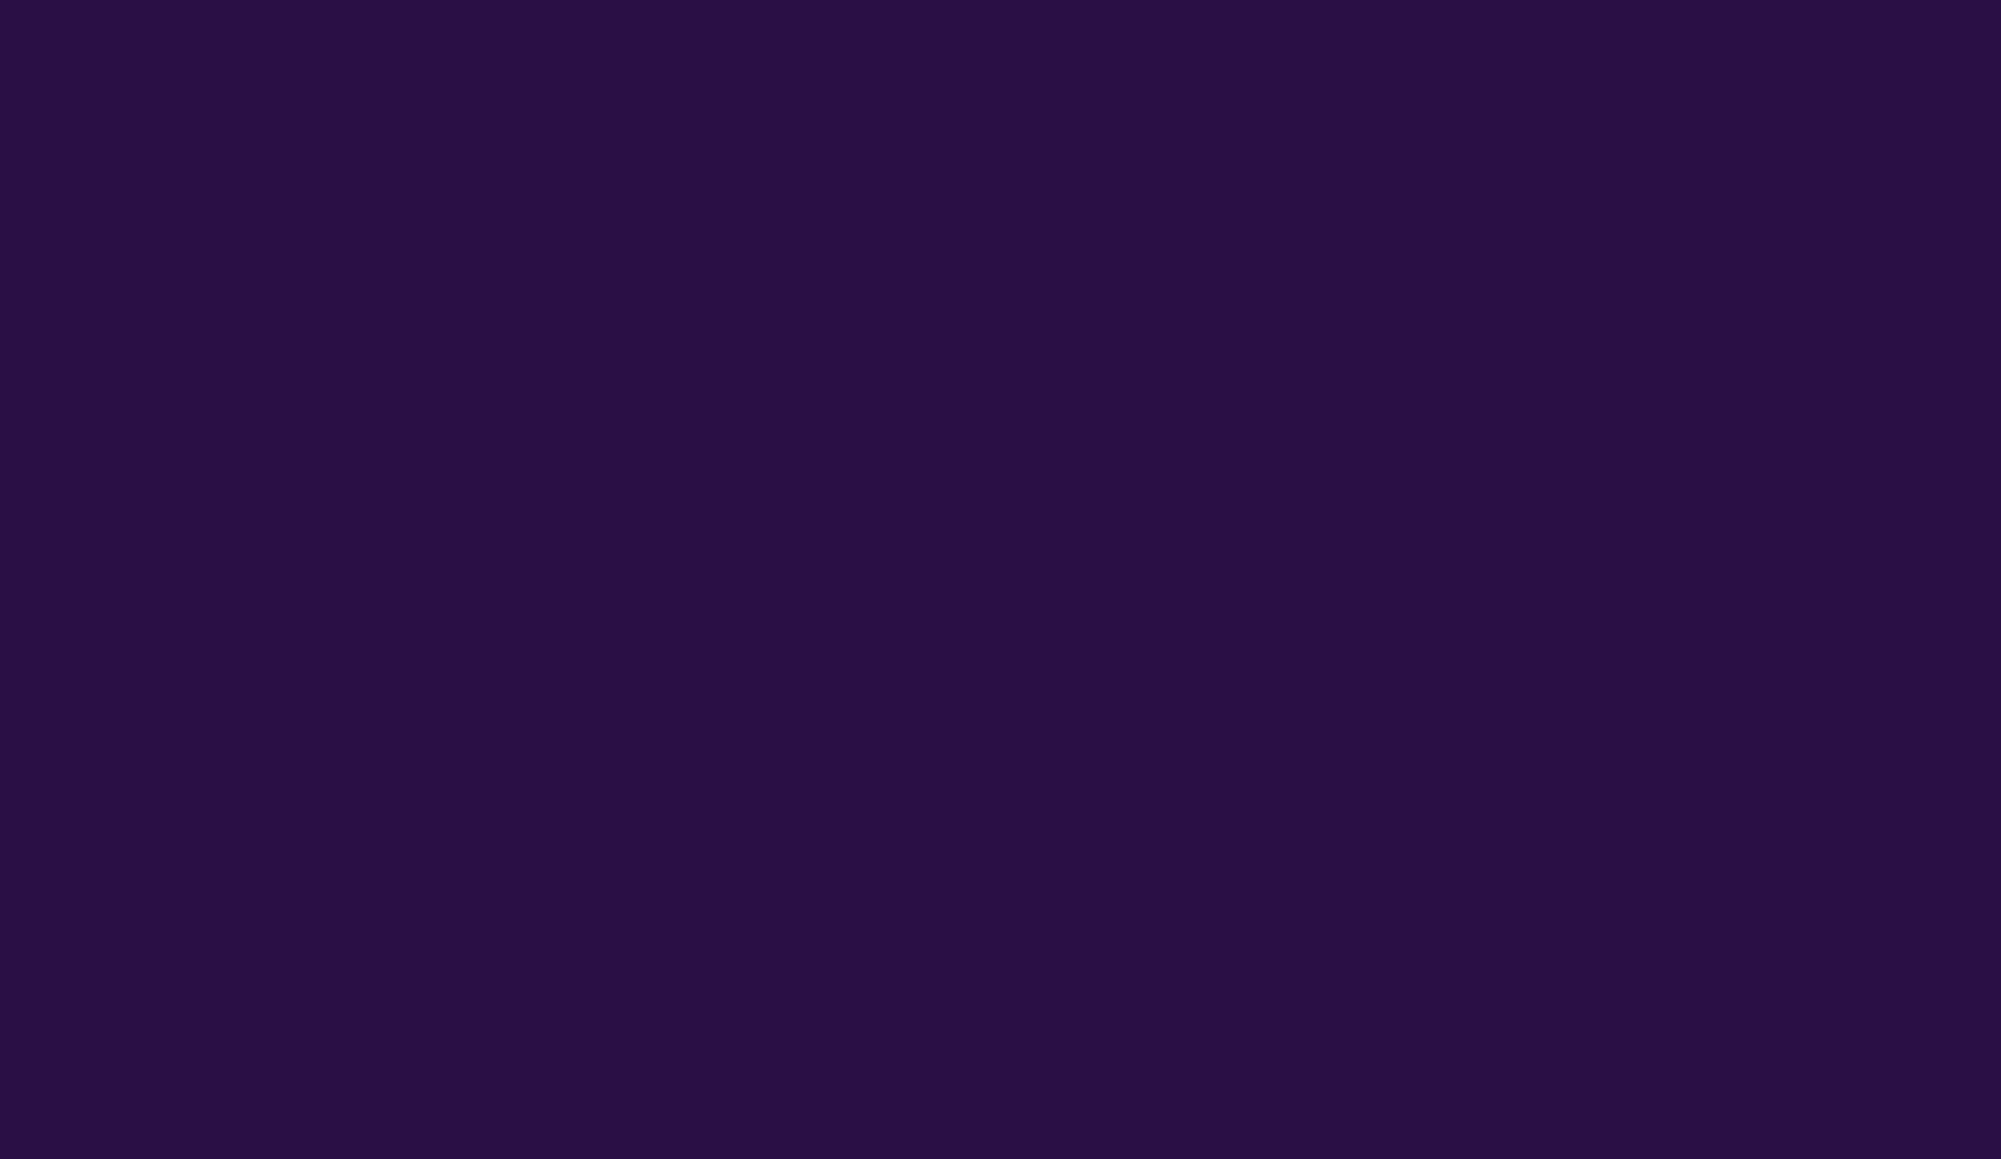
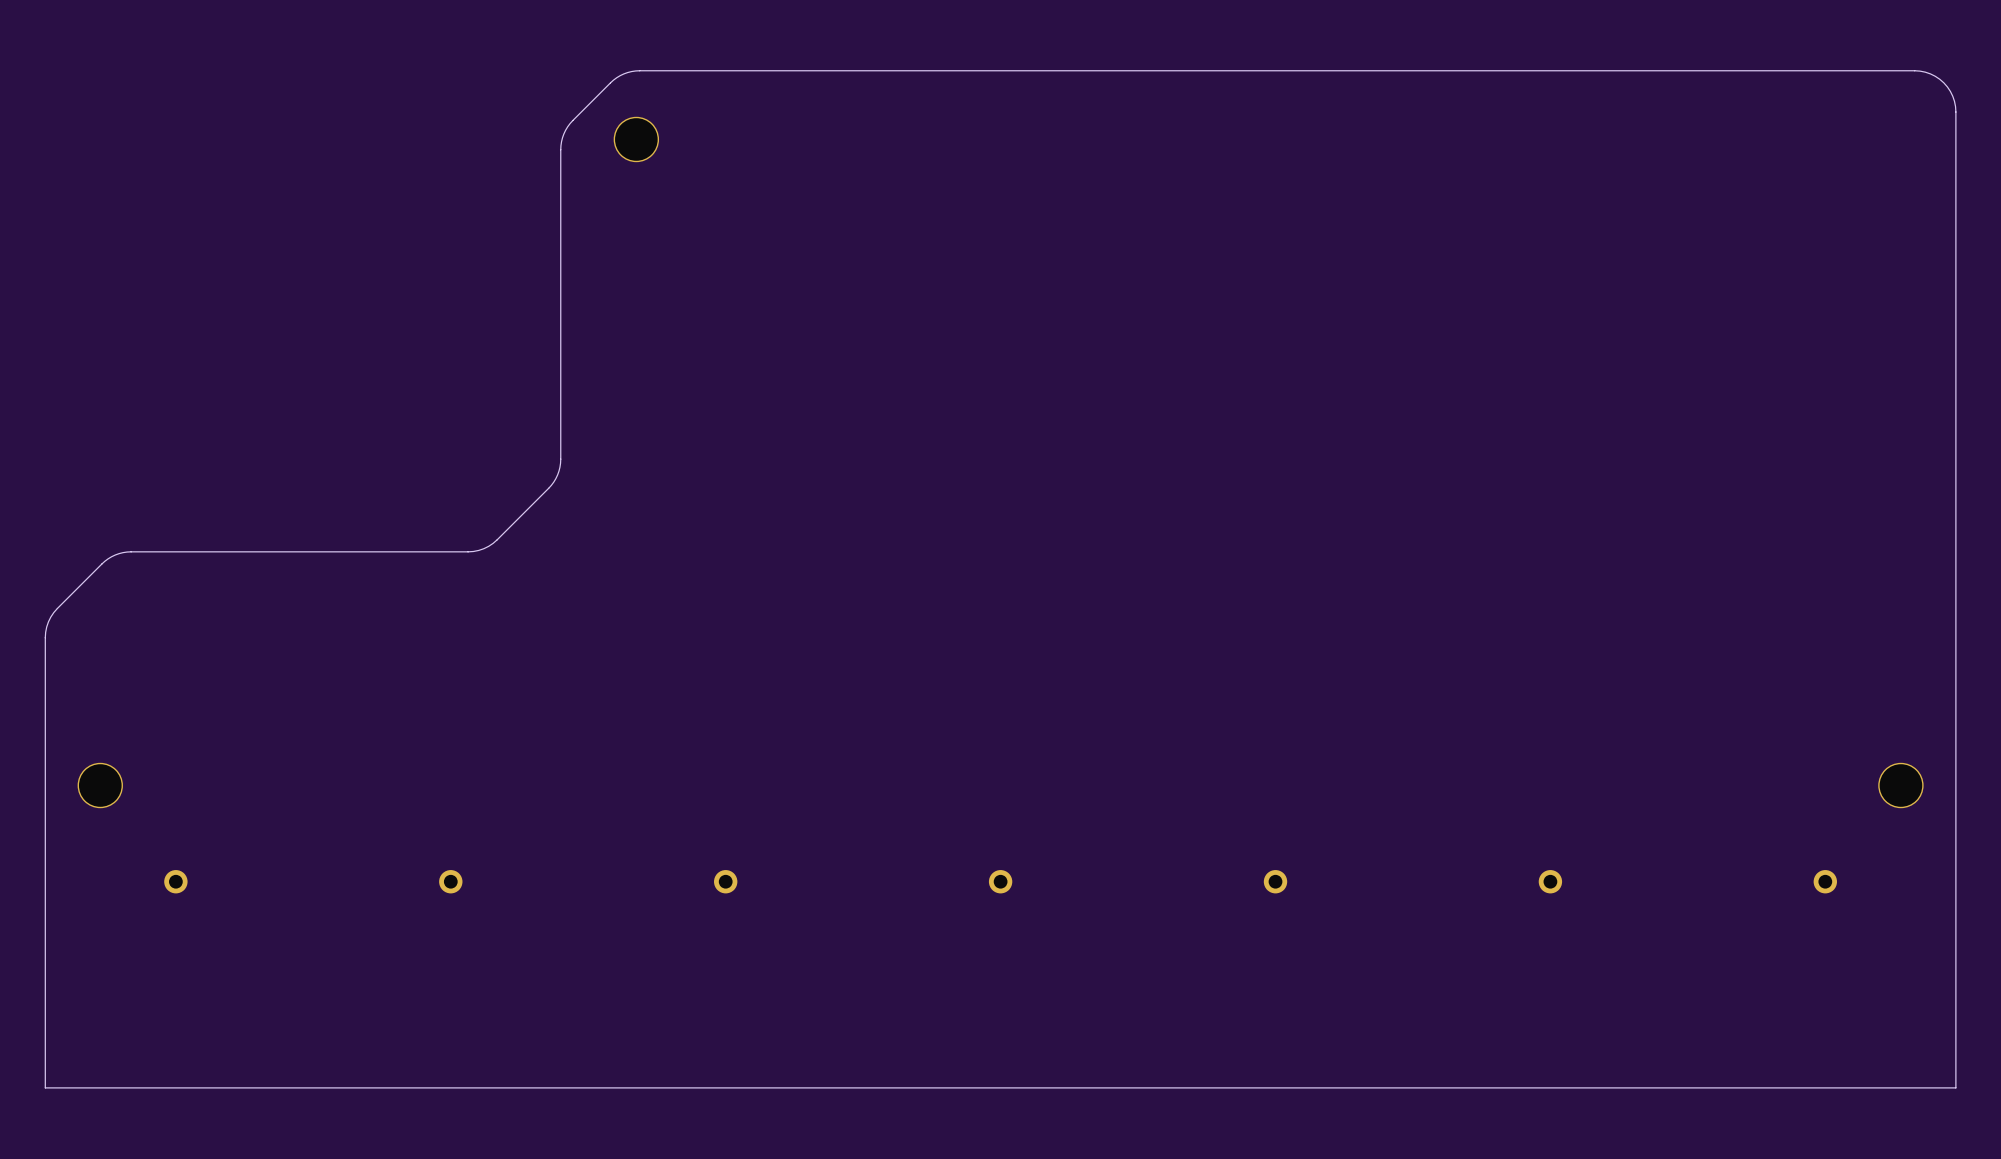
board edge: none -> (1914, 70) (639, 70) (620, 75) (610, 82) (570, 123) (561, 141) (560, 459) (558, 471) (551, 485) (497, 539) (483, 548) (468, 551) (123, 552) (104, 561) (50, 617) (45, 637) (45, 1087) (1955, 1087) (1955, 111) (1952, 96) (1943, 82) (1930, 73) (1914, 70)
part: none -> (636, 139)
part: none -> (100, 785)
part: none -> (1900, 785)
part: none -> (175, 881)
part: none -> (450, 881)
part: none -> (725, 881)
part: none -> (1000, 881)
part: none -> (1275, 881)
part: none -> (1550, 881)
part: none -> (1825, 881)

